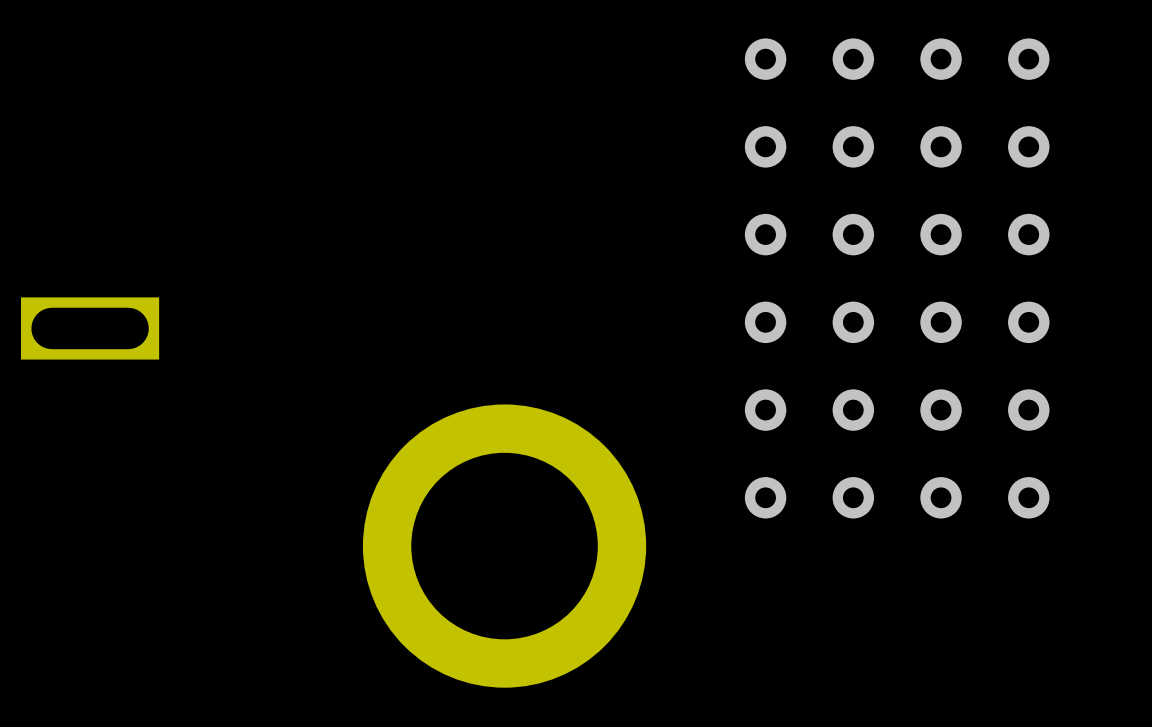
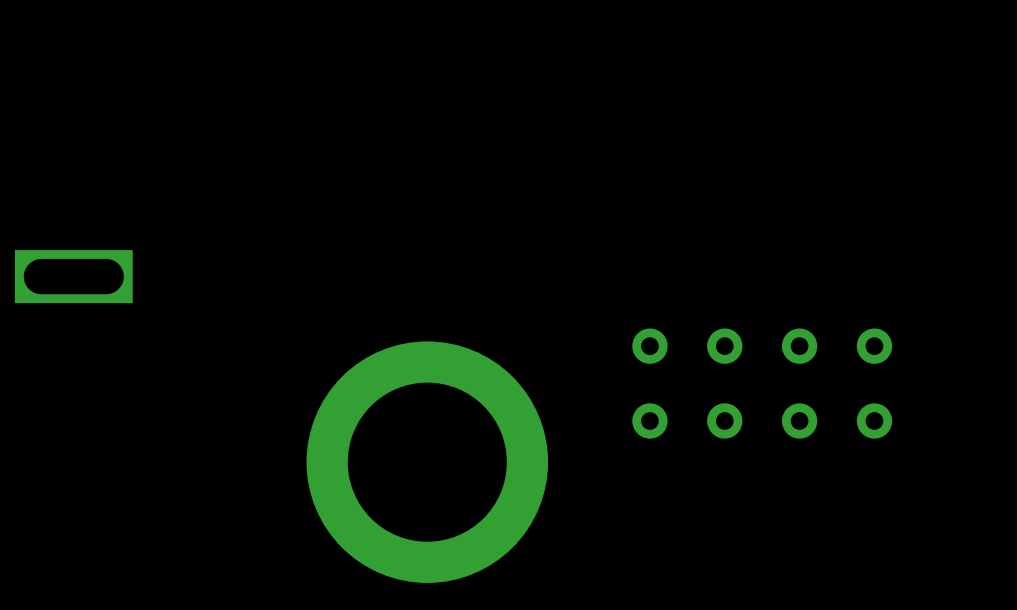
via: (765, 59) -> none
via: (853, 59) -> none
via: (941, 59) -> none
via: (1028, 59) -> none
via: (765, 146) -> none
via: (853, 146) -> none
via: (941, 146) -> none
via: (1028, 146) -> none
via: (765, 234) -> none
via: (853, 234) -> none
via: (941, 234) -> none
via: (1028, 234) -> none
via: (765, 322) -> none
via: (853, 322) -> none
via: (941, 322) -> none
via: (1028, 322) -> none

